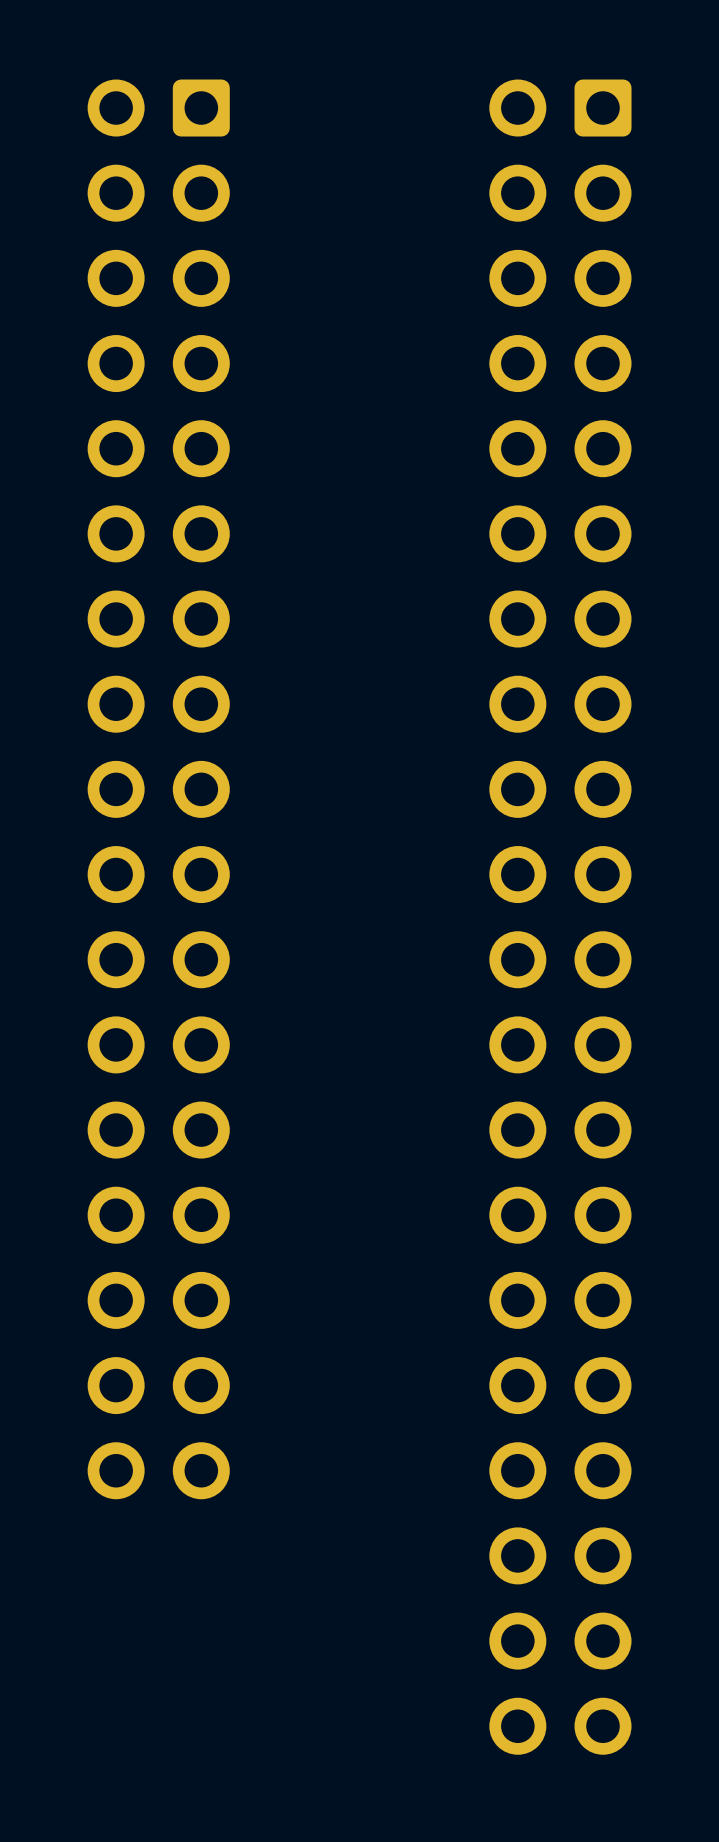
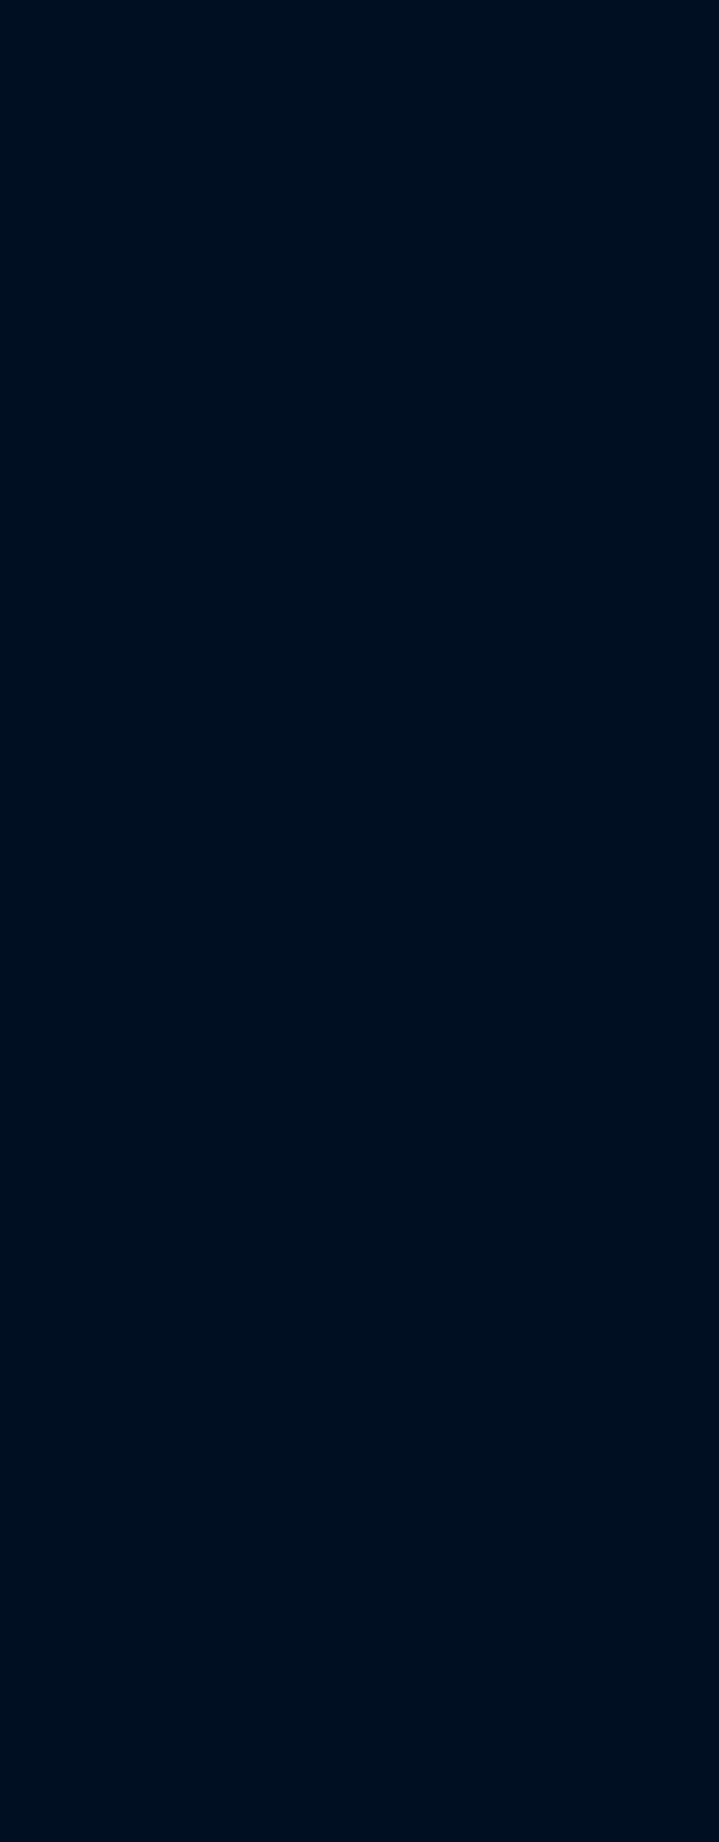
part: (158, 789) -> none
part: (560, 917) -> none

